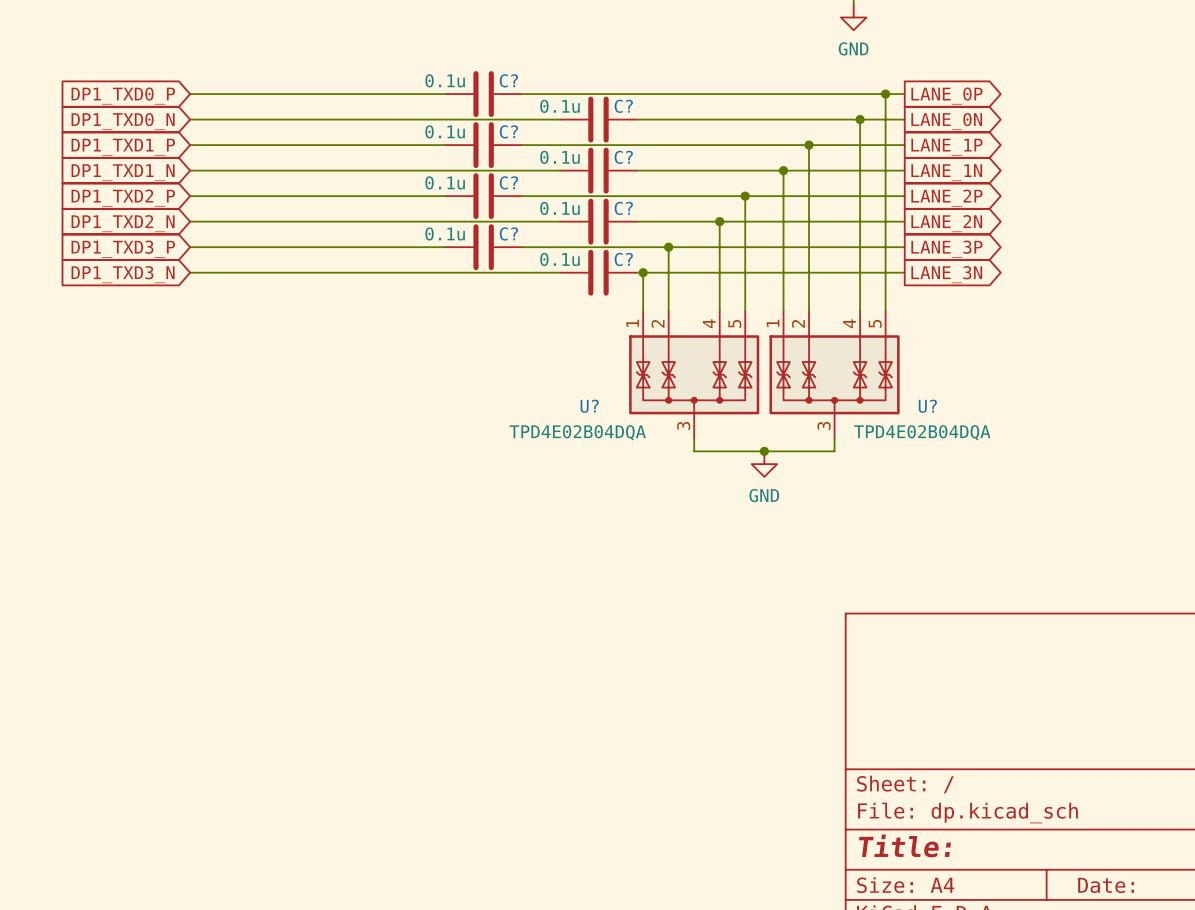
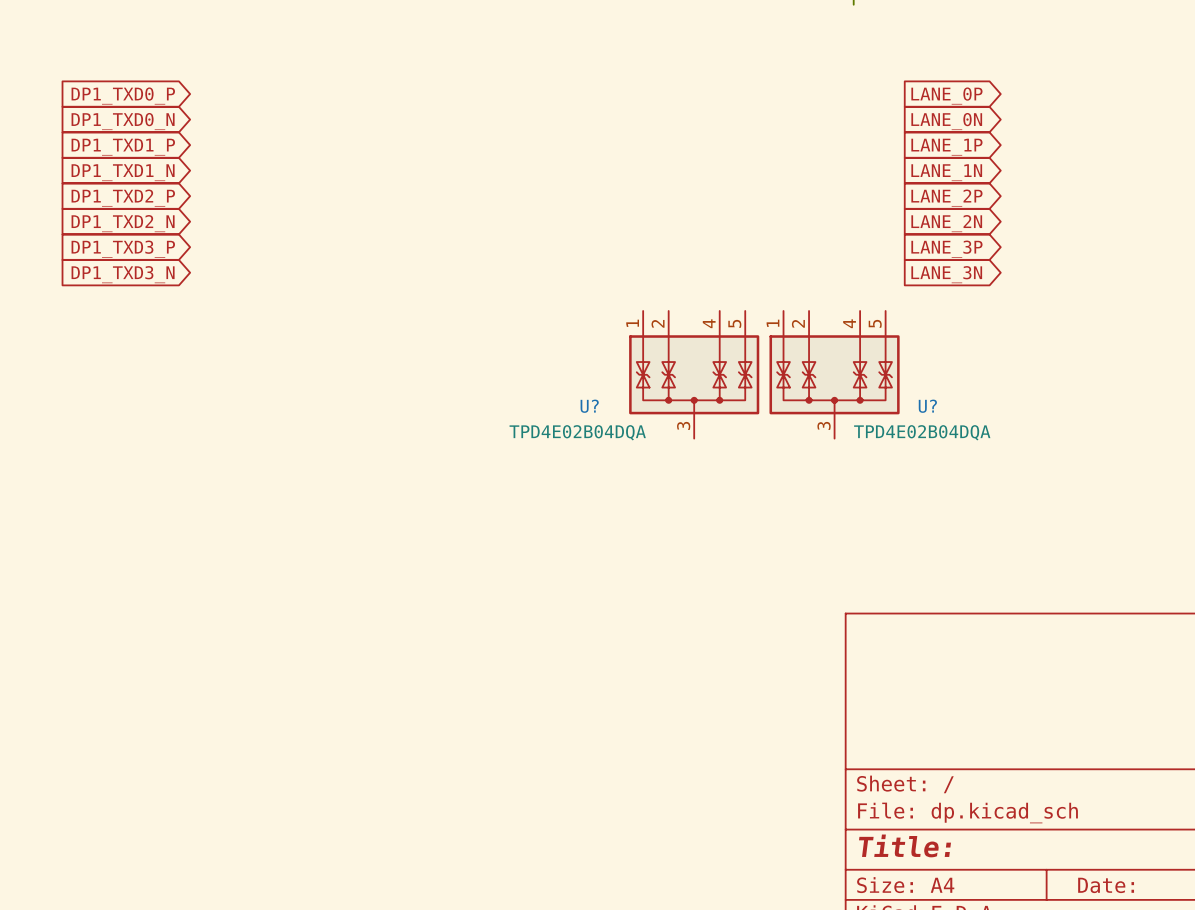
power symbol: GND (853, 17) -> none
wire: (190, 94) (445, 94) -> none
C?: 0.1u (483, 94) -> none
wire: (521, 94) (904, 94) -> none
wire: (885, 94) (885, 310) -> none
junction: (885, 94) -> none
wire: (190, 119) (560, 119) -> none
C?: 0.1u (598, 119) -> none
wire: (636, 119) (904, 119) -> none
wire: (860, 119) (860, 310) -> none
junction: (860, 119) -> none
wire: (190, 145) (445, 145) -> none
C?: 0.1u (483, 145) -> none
wire: (521, 145) (904, 145) -> none
wire: (809, 145) (809, 310) -> none
junction: (809, 145) -> none
wire: (190, 170) (560, 170) -> none
C?: 0.1u (598, 170) -> none
wire: (636, 170) (904, 170) -> none
wire: (783, 170) (783, 310) -> none
junction: (783, 170) -> none
wire: (190, 196) (445, 196) -> none
C?: 0.1u (483, 196) -> none
wire: (521, 196) (904, 196) -> none
wire: (745, 196) (745, 310) -> none
junction: (745, 196) -> none
wire: (190, 221) (560, 221) -> none
C?: 0.1u (598, 221) -> none
wire: (636, 221) (904, 221) -> none
wire: (719, 221) (719, 310) -> none
junction: (719, 221) -> none
wire: (190, 247) (445, 247) -> none
C?: 0.1u (483, 247) -> none
wire: (521, 247) (904, 247) -> none
wire: (668, 247) (668, 310) -> none
junction: (668, 247) -> none
wire: (190, 272) (560, 272) -> none
C?: 0.1u (598, 272) -> none
wire: (636, 272) (904, 272) -> none
wire: (643, 272) (643, 310) -> none
junction: (643, 272) -> none
wire: (694, 438) (694, 451) (834, 451) (834, 438) -> none
junction: (764, 451) -> none
power symbol: GND (764, 464) -> none

